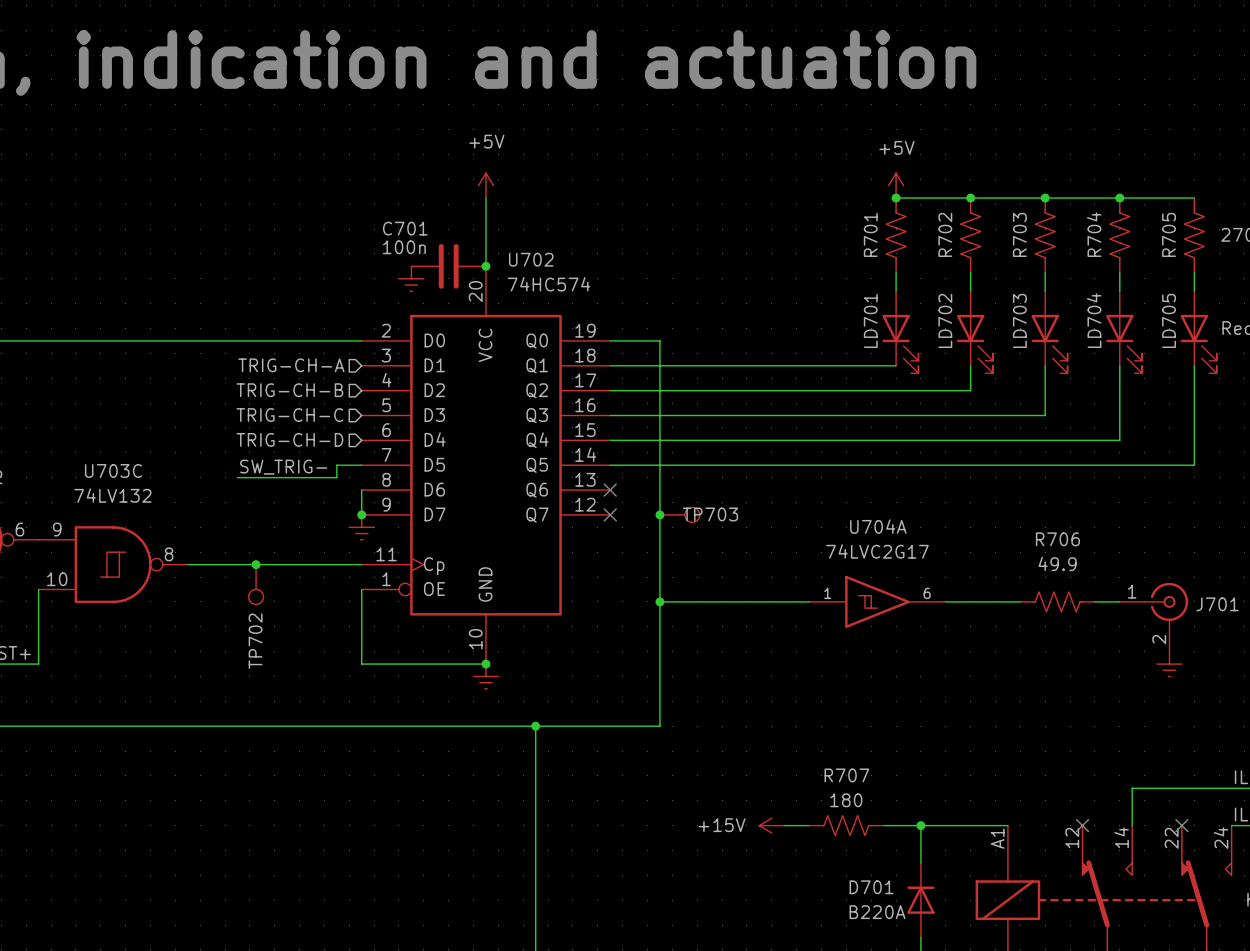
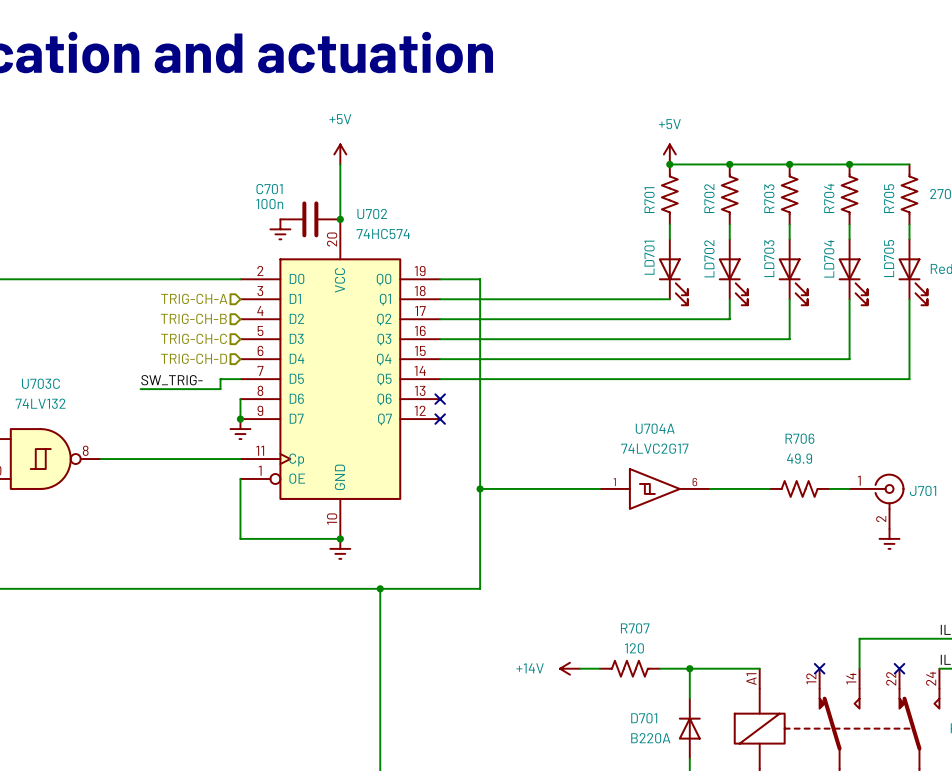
junction: (659, 514) -> none
TP703: (679, 514) -> none
junction: (256, 564) -> none
TP702: (256, 584) -> none
R707 value: 180 (846, 800) -> 120 (634, 648)
power symbol: +15V (771, 825) -> +14V (569, 668)

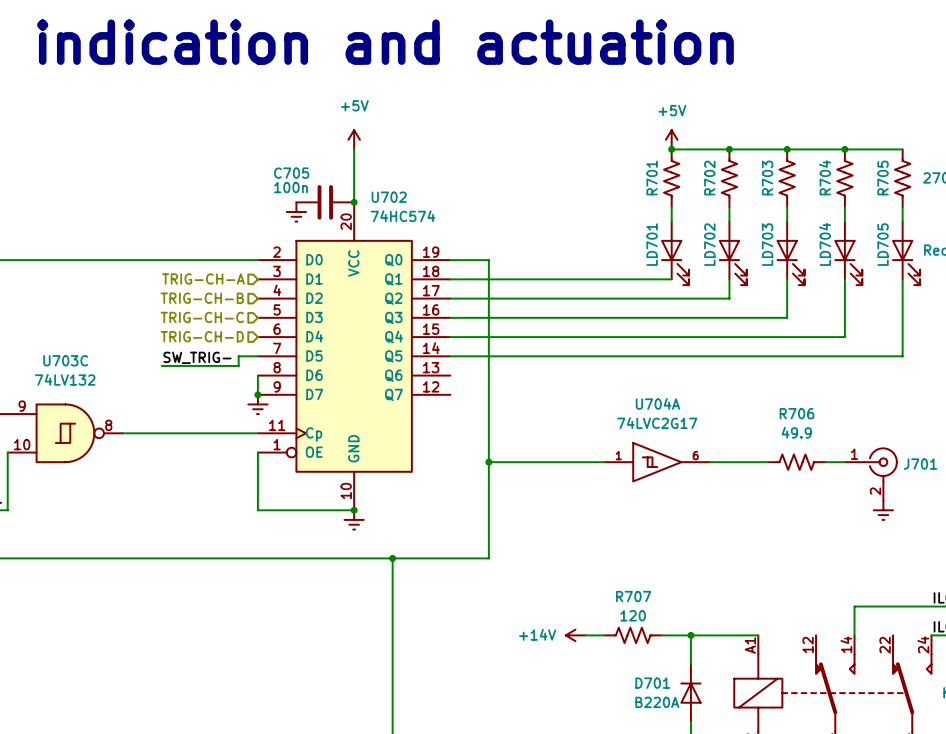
C701 name: C701 (269, 189) -> C705 (291, 173)
no-connect mark: (440, 399) -> none
no-connect mark: (440, 419) -> none
no-connect mark: (819, 668) -> none
no-connect mark: (899, 668) -> none

